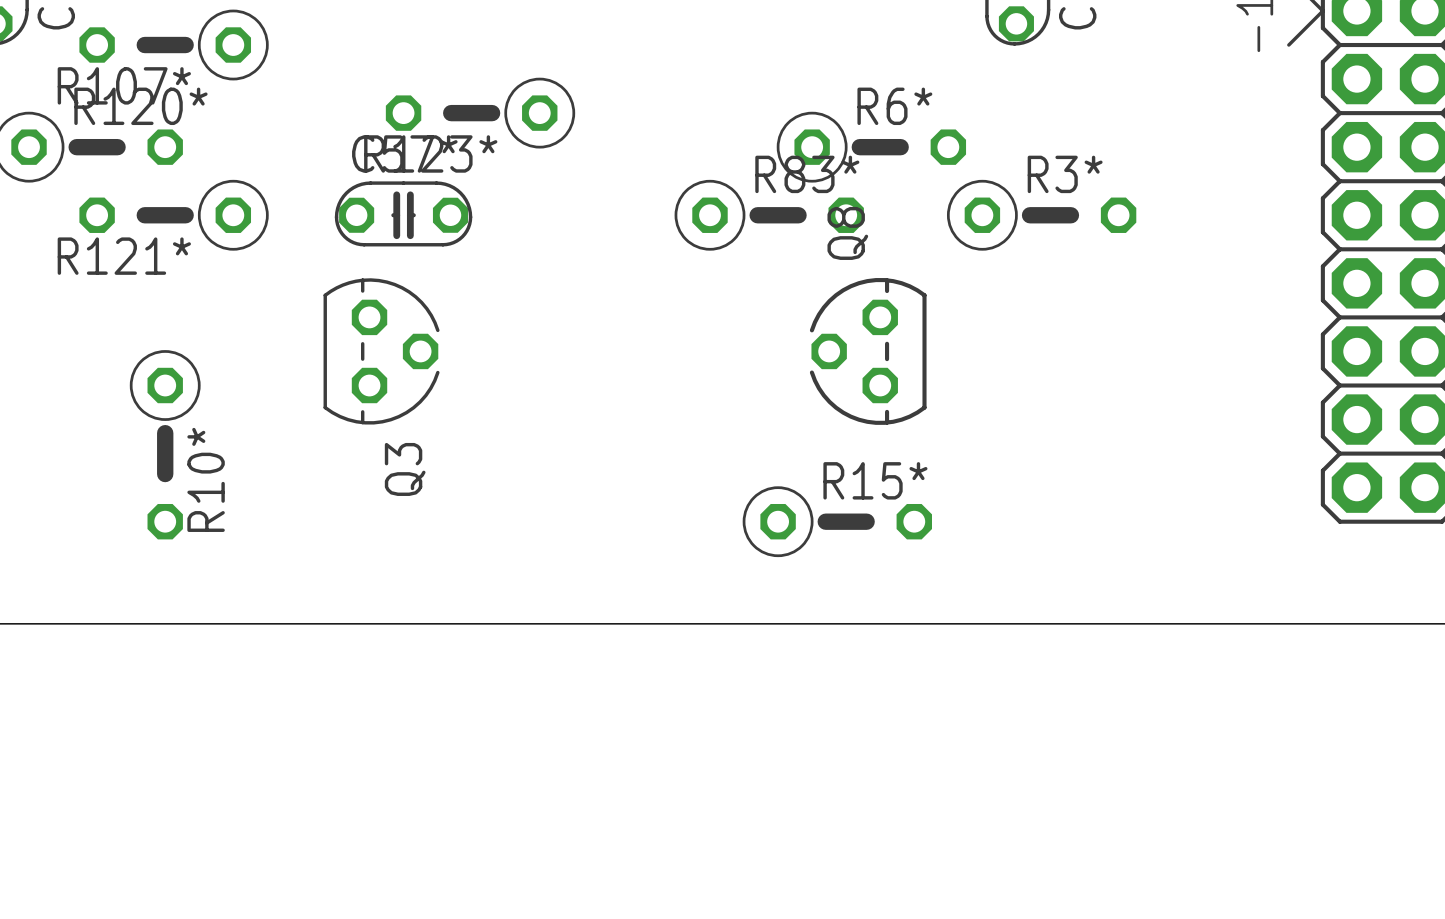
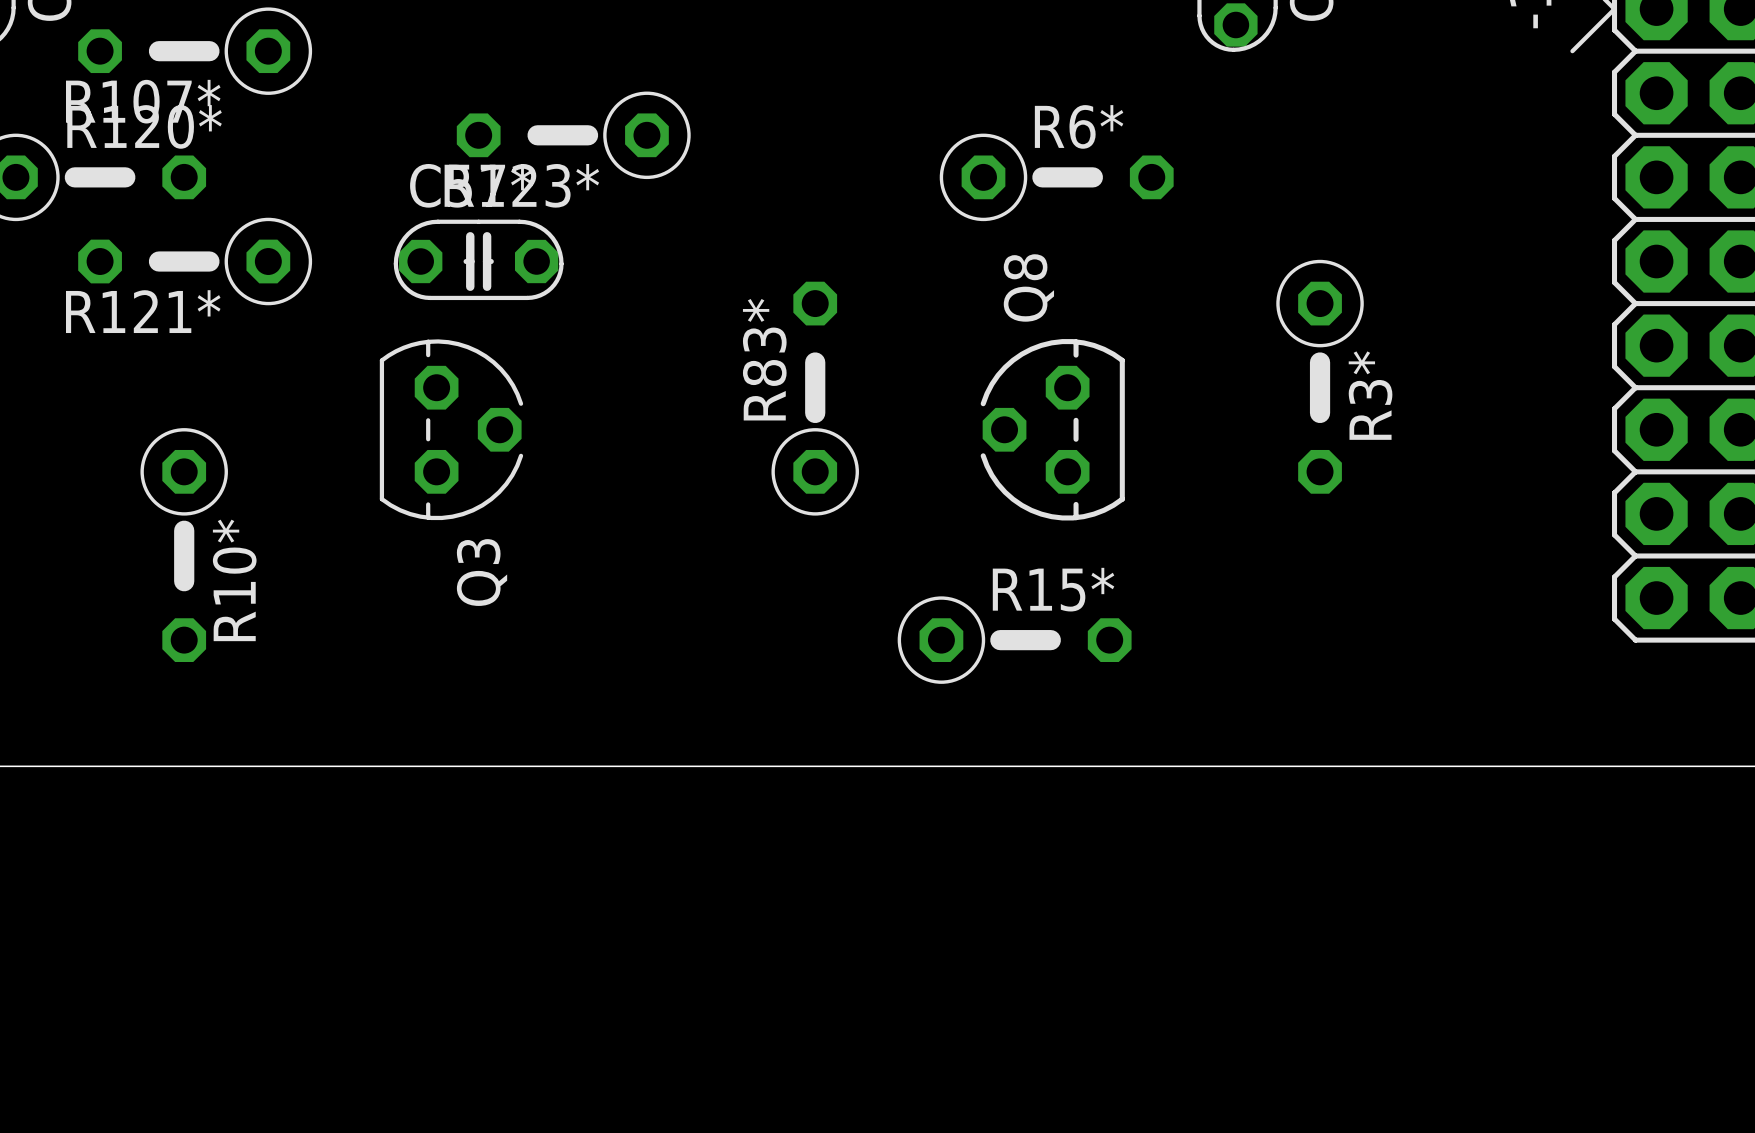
R83* rotation: 0° (769, 215) -> 90° counterclockwise (815, 398)
R83* position: (769, 215) -> (815, 398)
R3* rotation: 0° (1041, 215) -> 90° clockwise (1320, 376)

